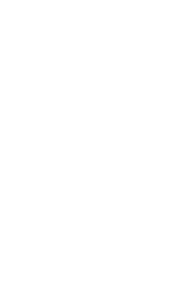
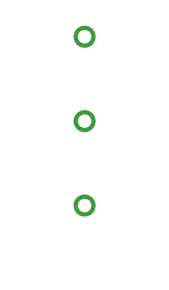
part: none -> (84, 36)
part: none -> (84, 121)
part: none -> (84, 205)

